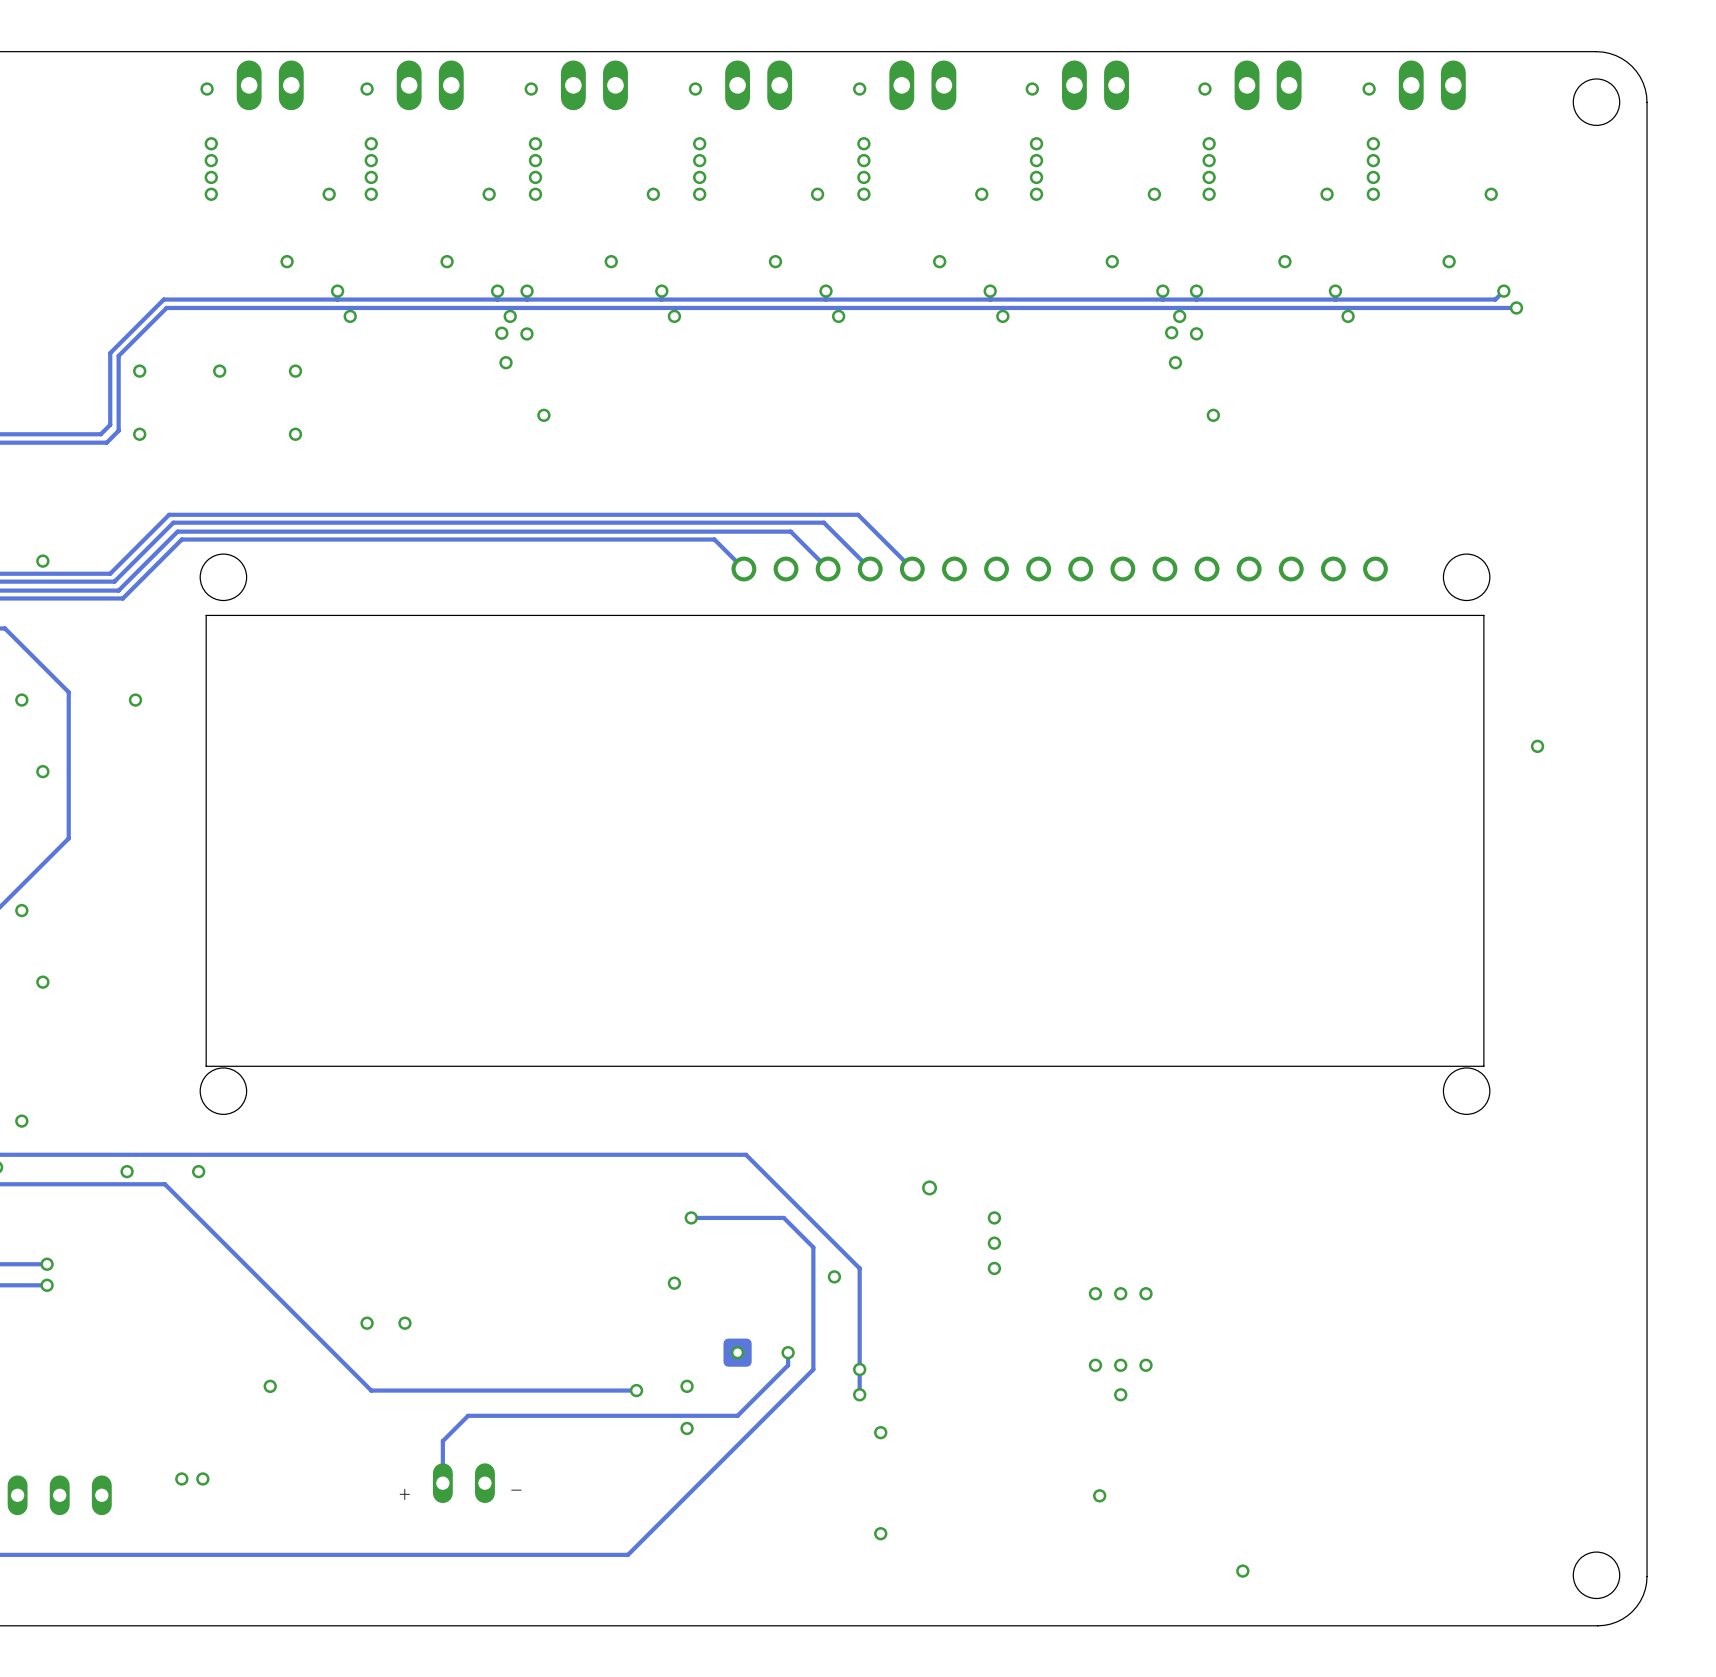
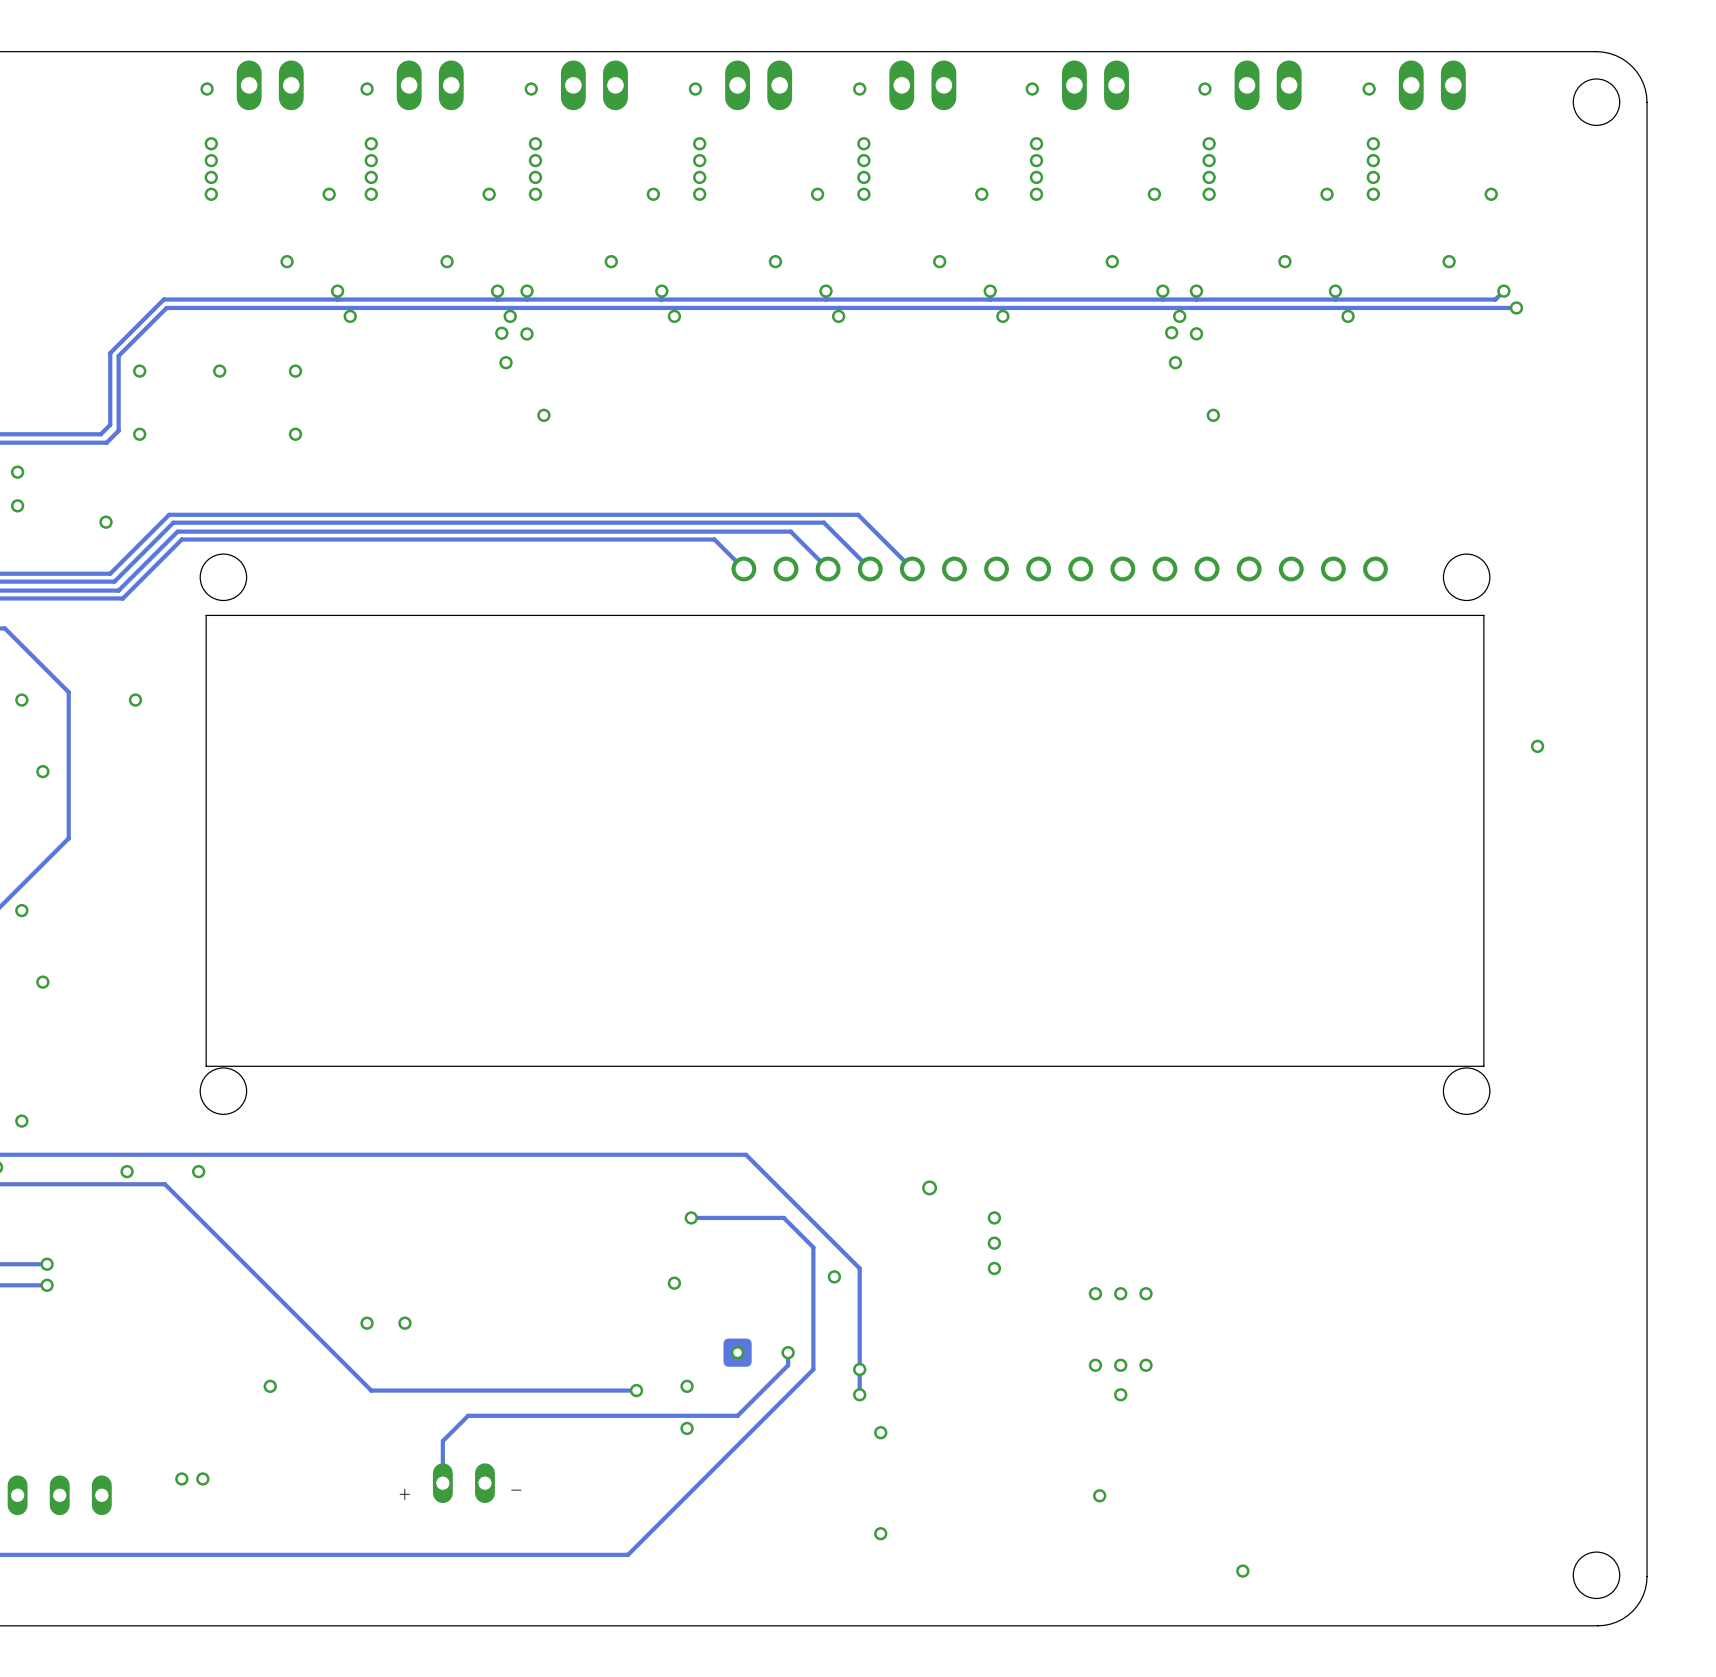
via: none -> (17, 472)
via: none -> (17, 505)
via: none -> (106, 522)
via: (42, 561) -> none

